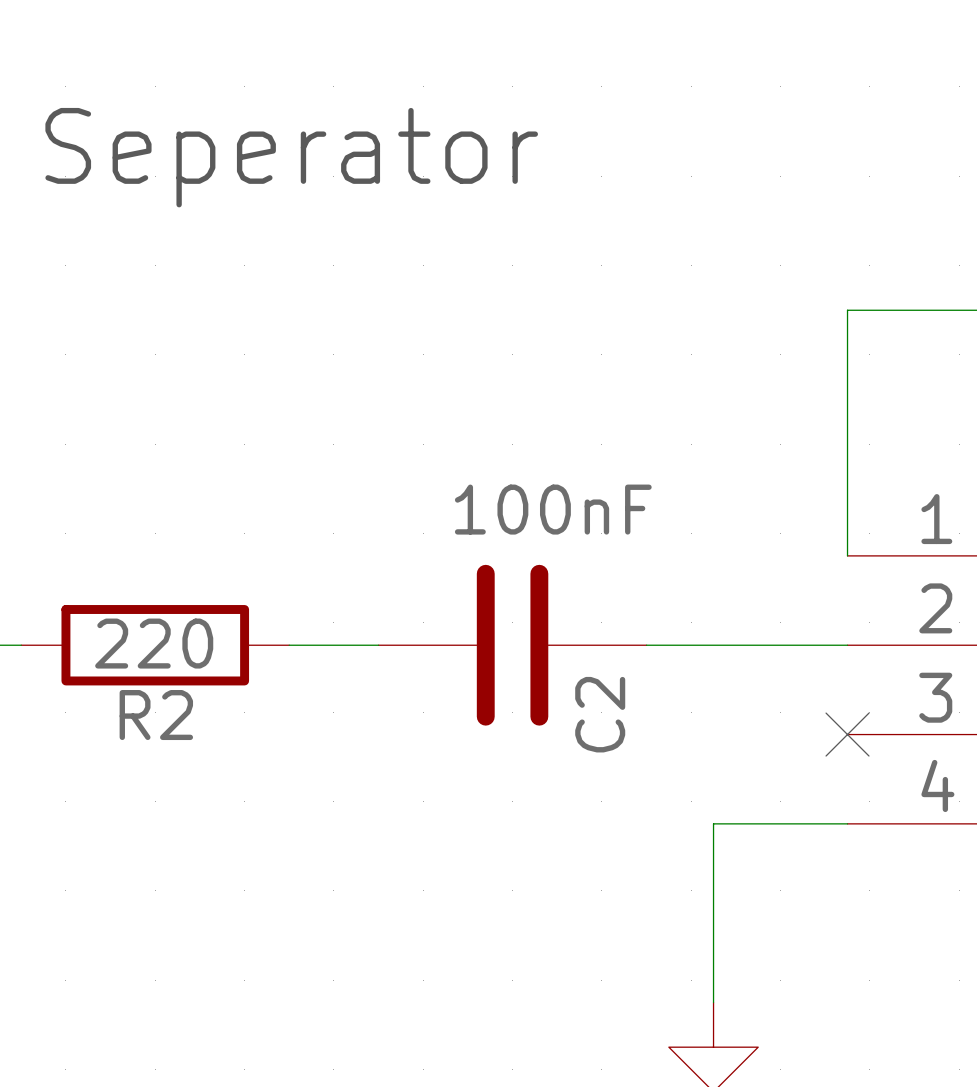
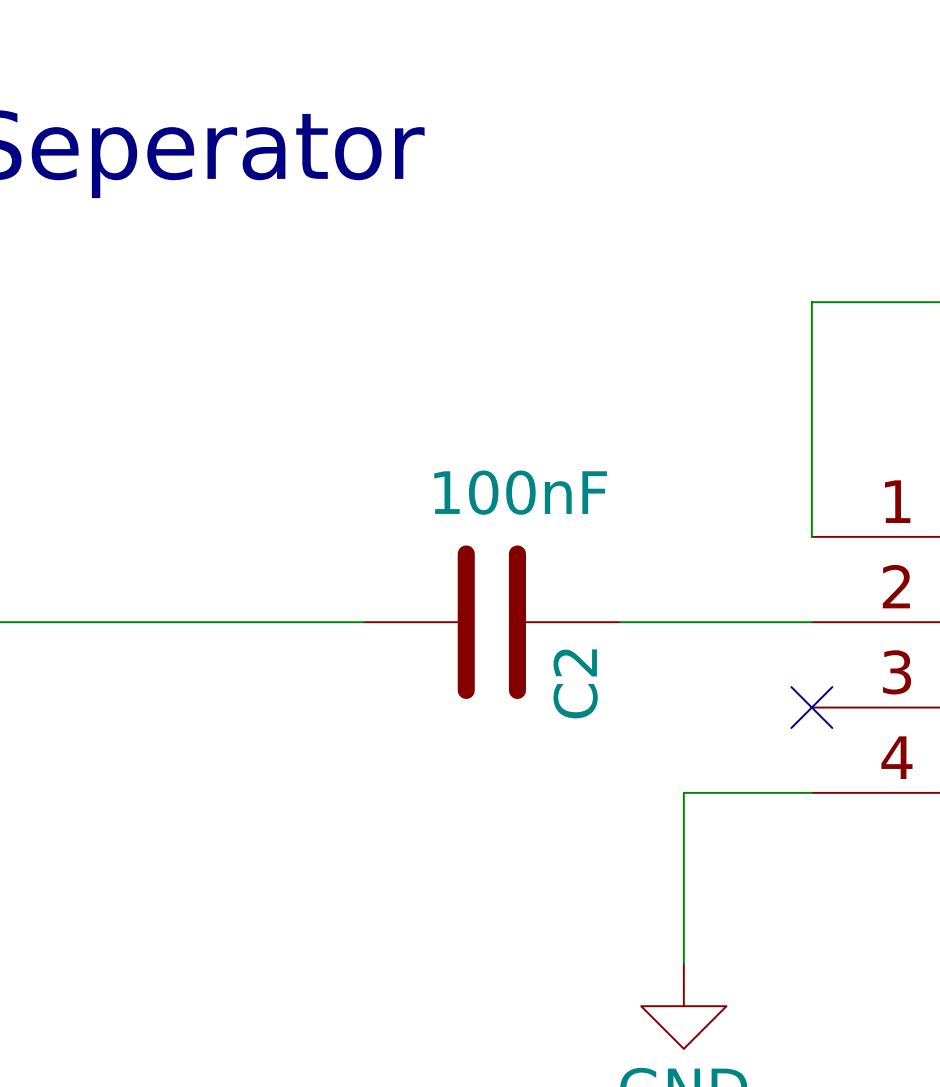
wire: none -> (22, 622) (278, 622)
R2: 220 (155, 645) -> none

